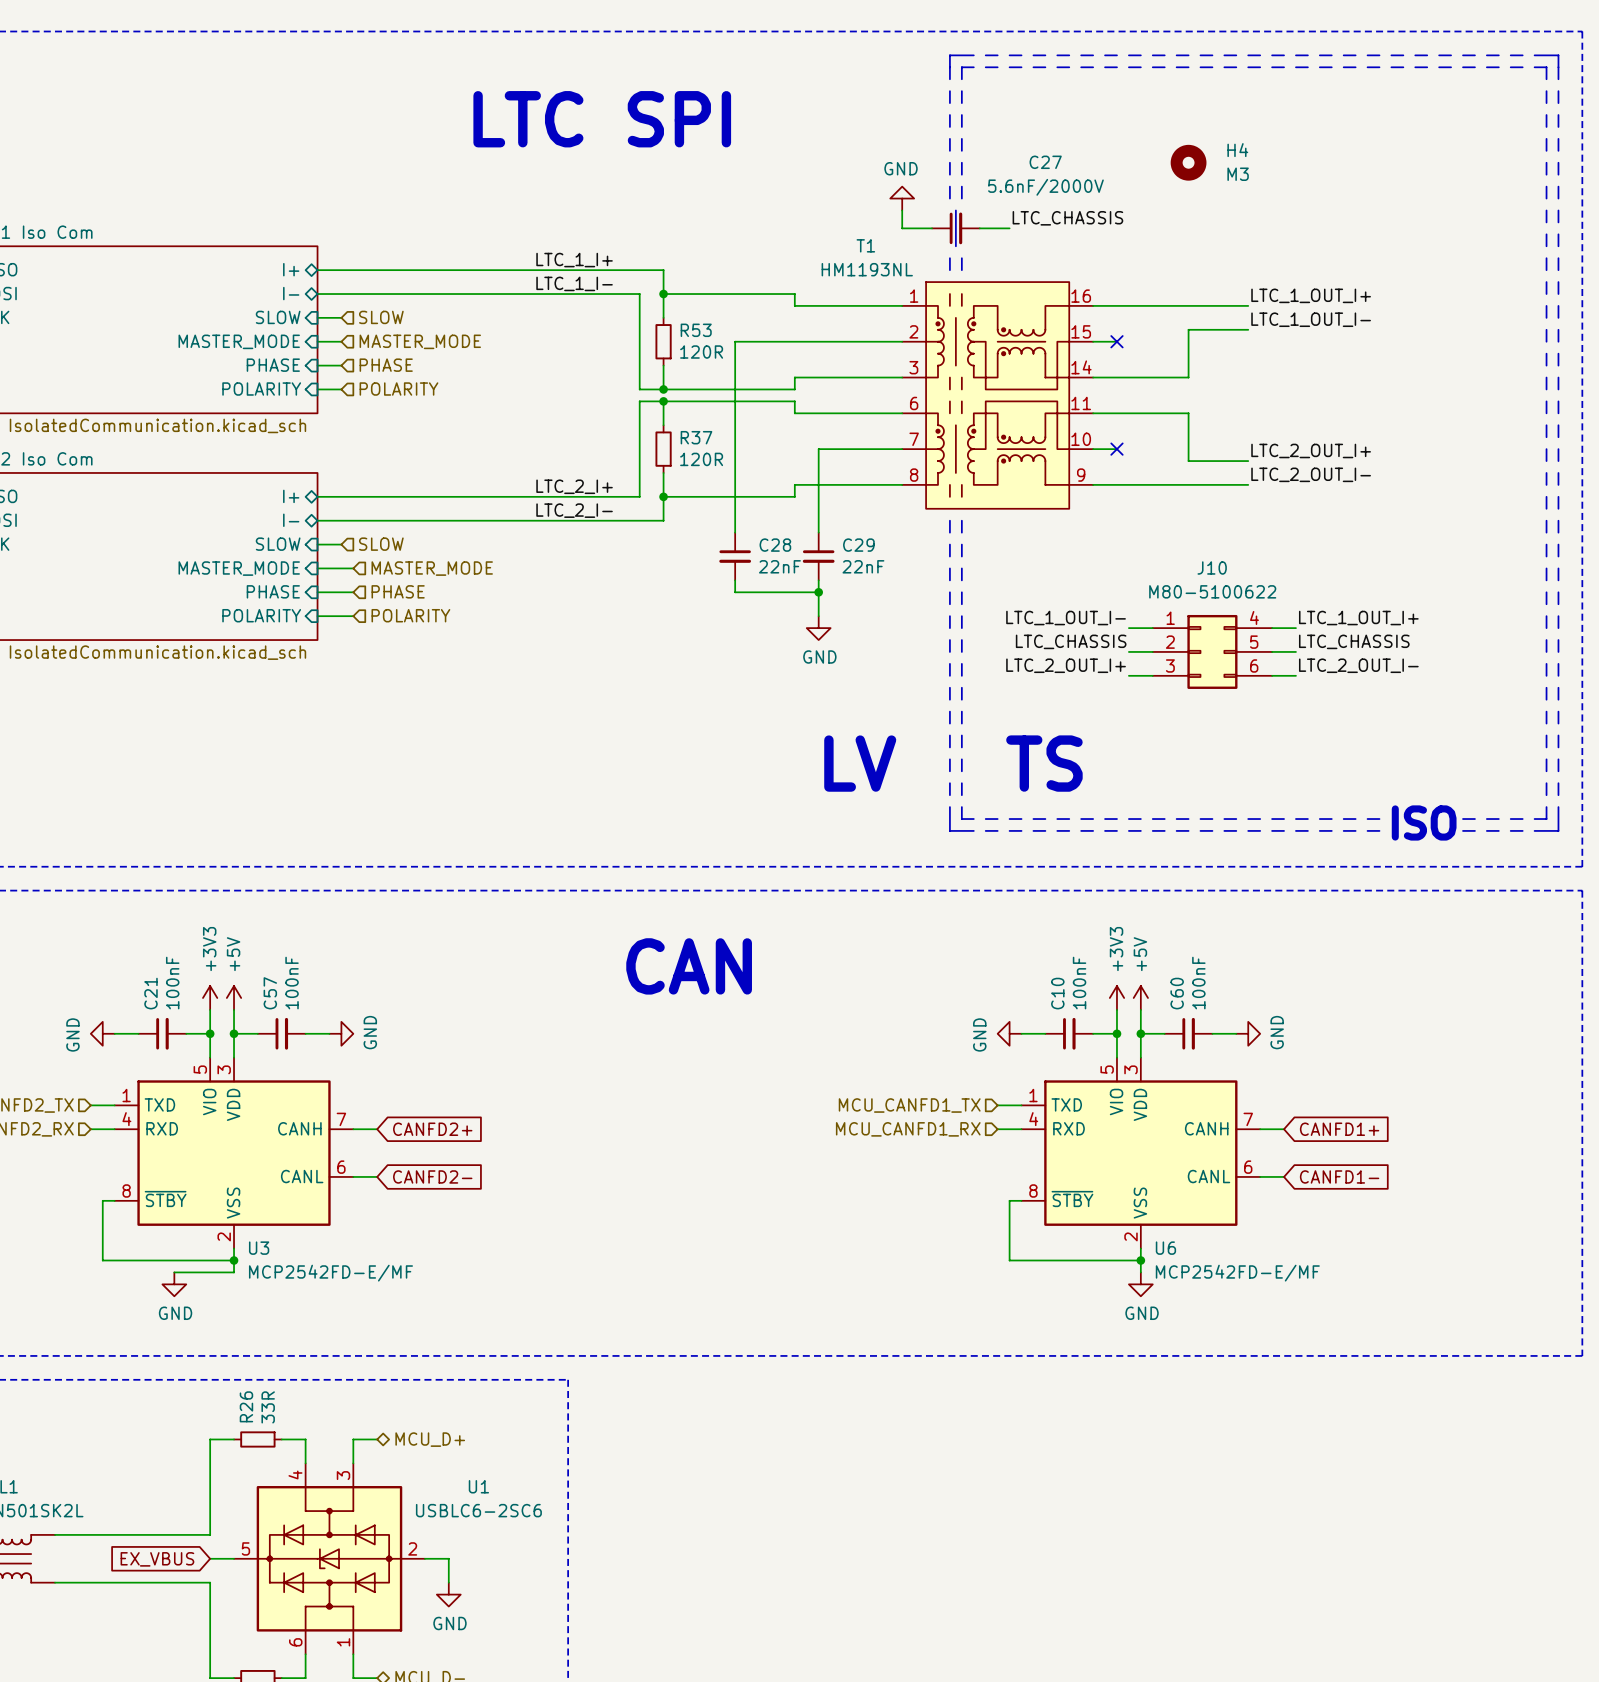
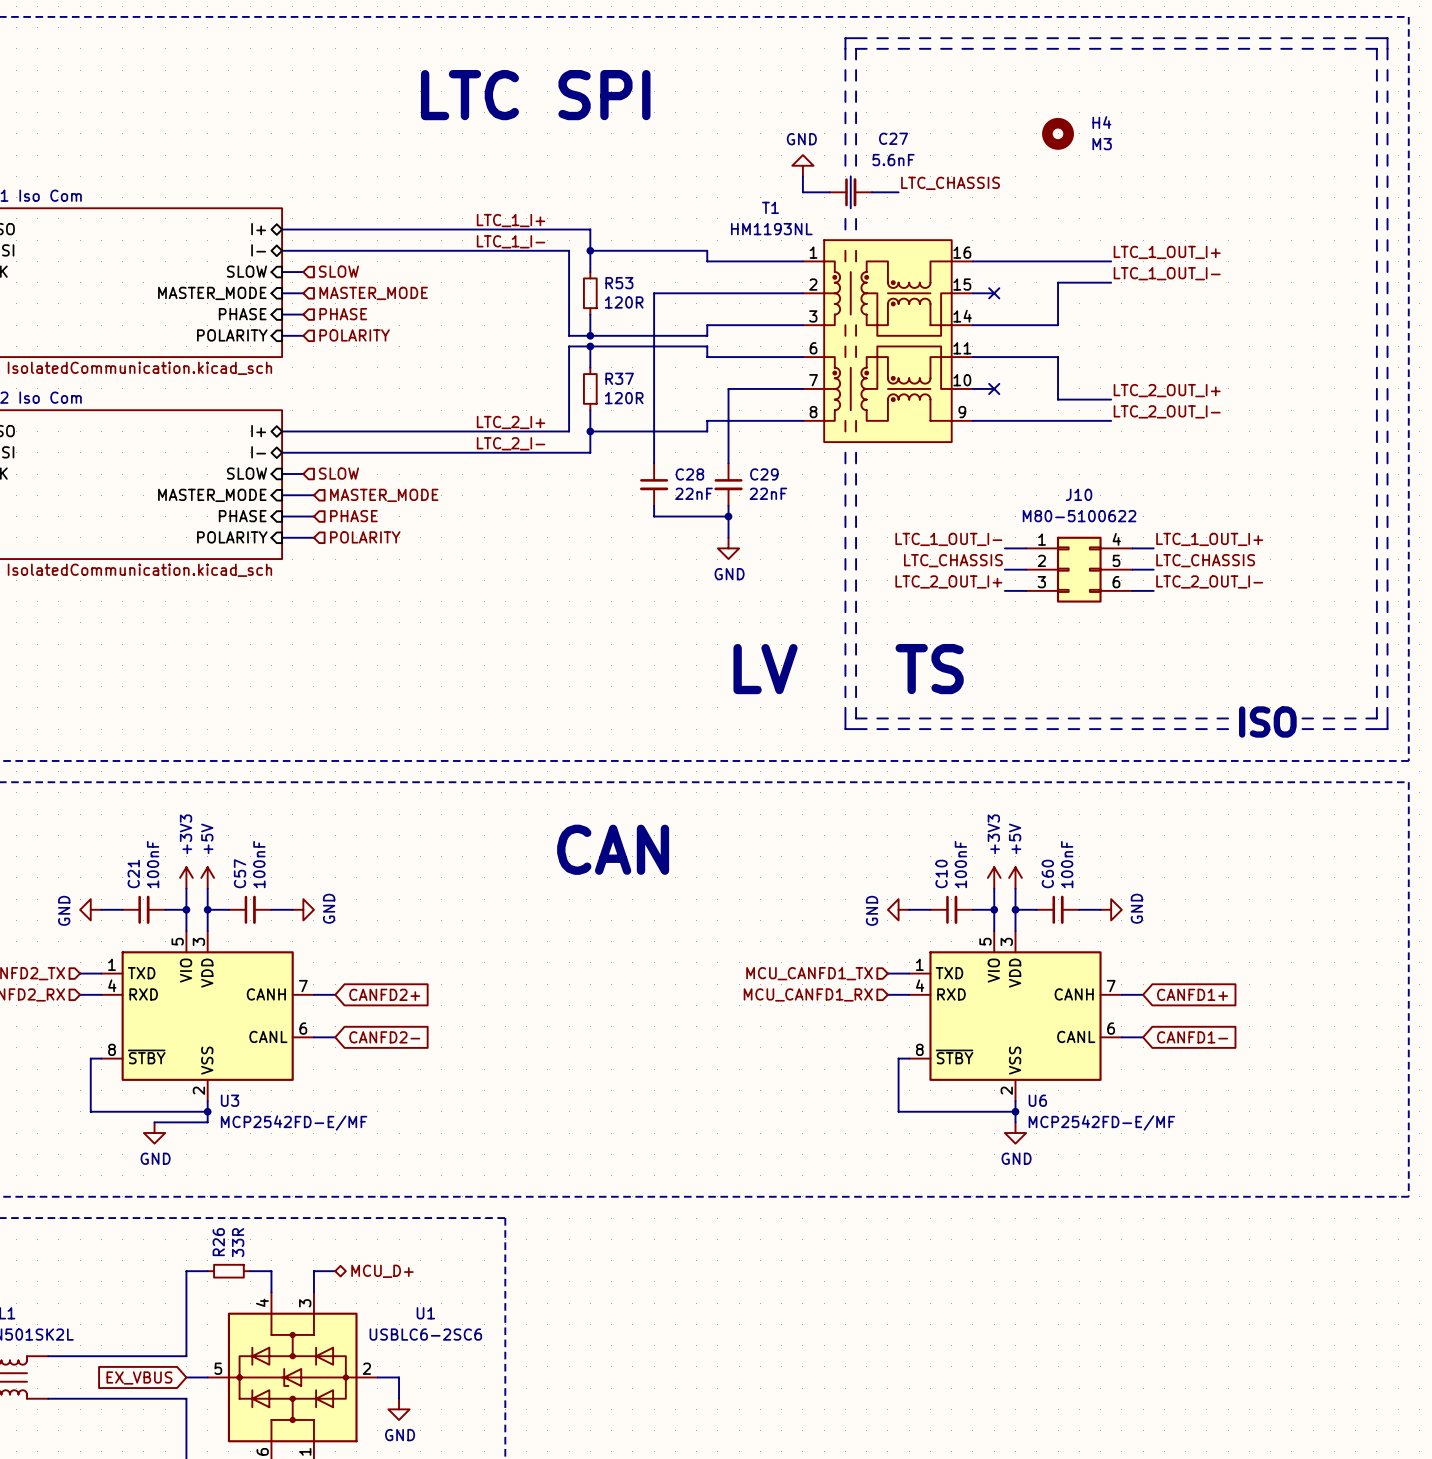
C27 name position: C27 (1045, 162) -> C27 (893, 138)
C27 value: 5.6nF/2000V (1045, 187) -> 5.6nF (893, 160)

